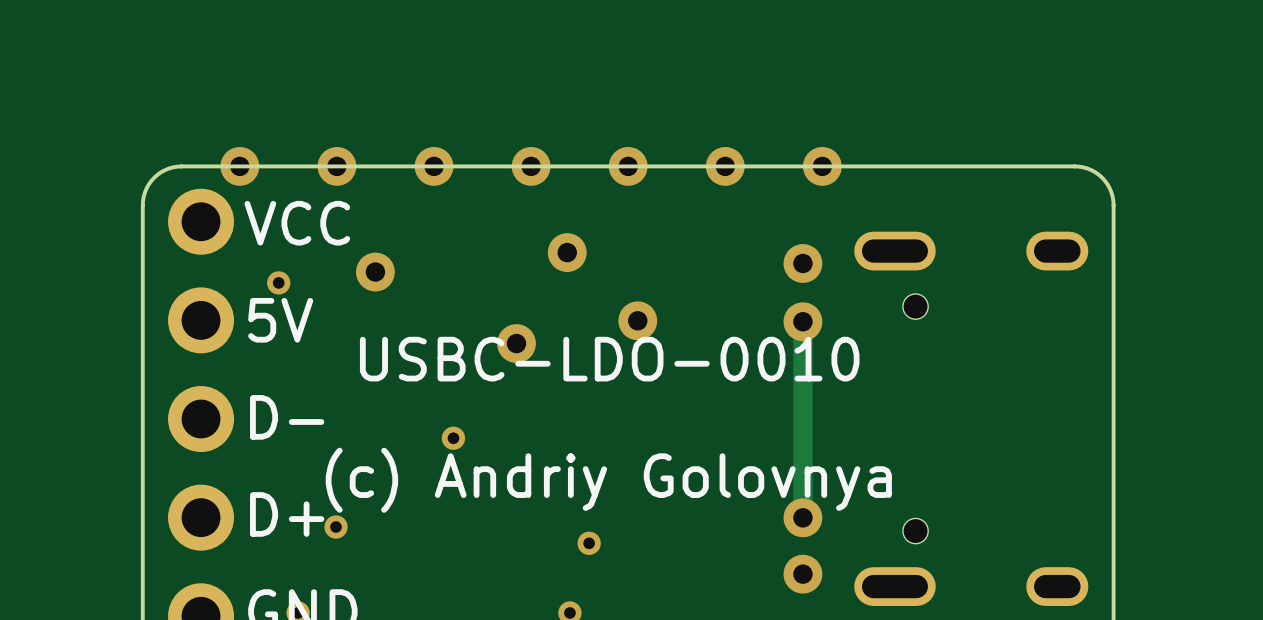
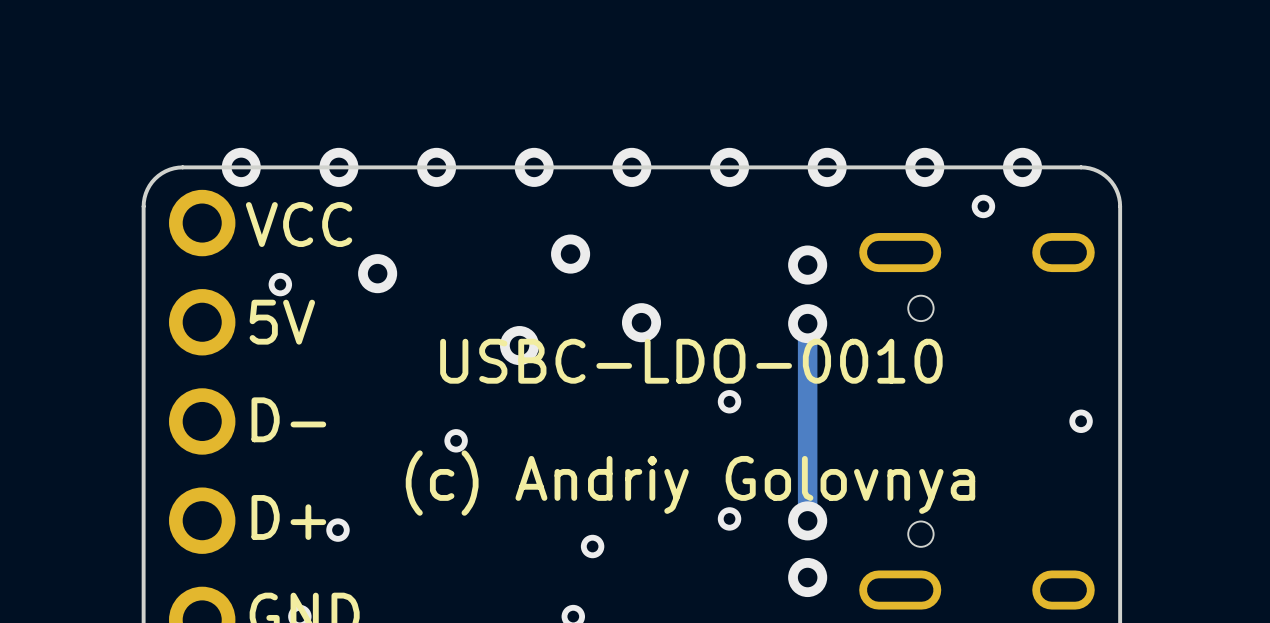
via: none -> (924, 167)
via: none -> (1022, 167)
via: none -> (983, 206)
text position: USBC-LDO-0010 (609, 359) -> USBC-LDO-0010 (691, 361)
via: none -> (729, 401)
via: none -> (1081, 421)
text position: (c) Andriy Golovnya (608, 480) -> (c) Andriy Golovnya (690, 483)
via: none -> (729, 518)

